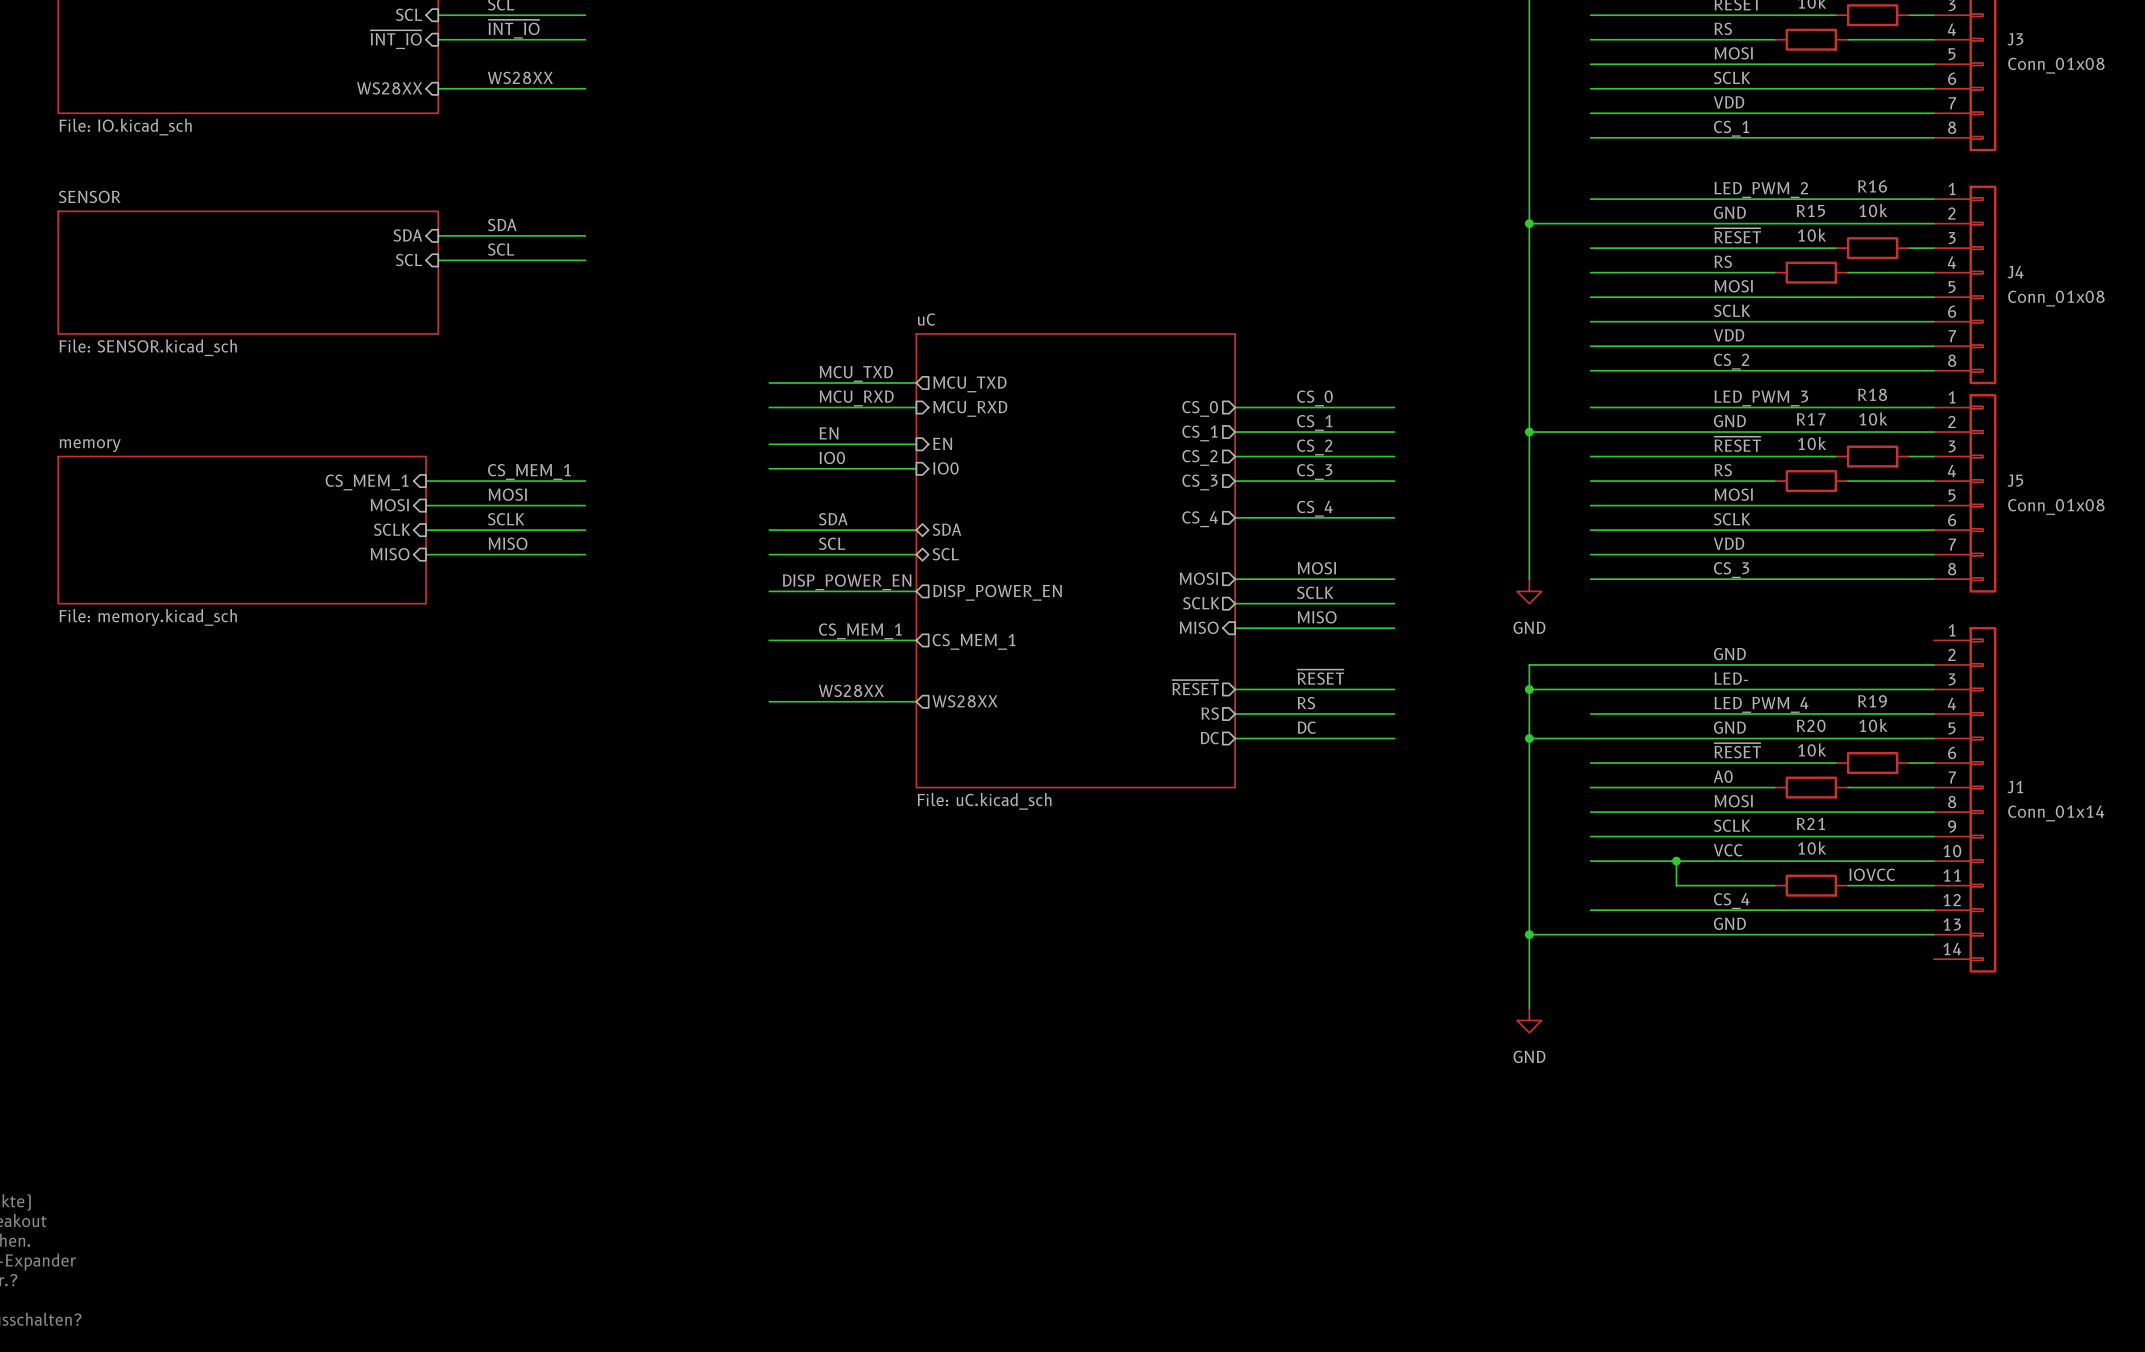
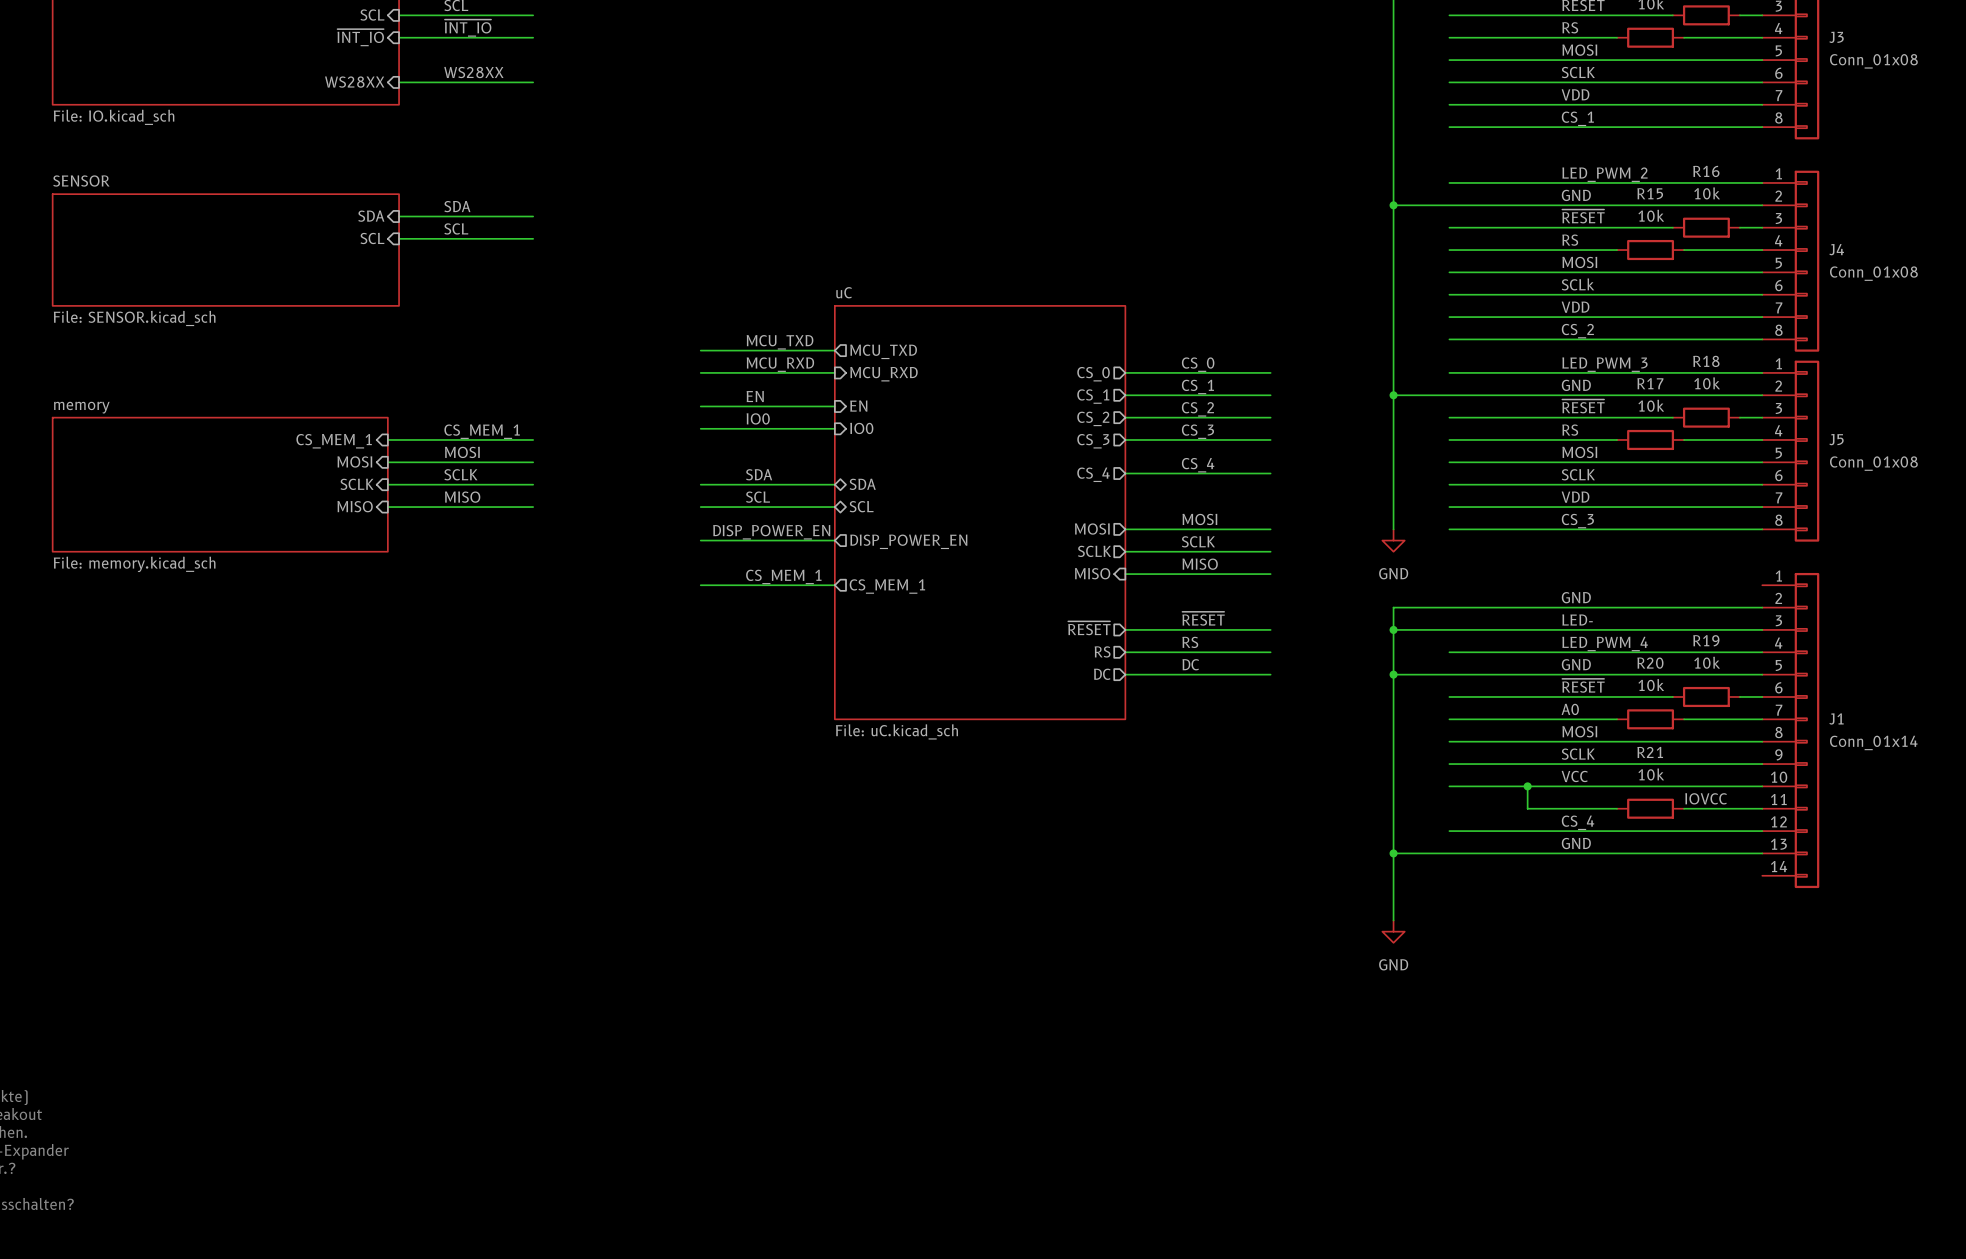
label: SCLK (1732, 310) -> SCLk (1578, 284)
label: WS28XX (851, 690) -> none
wire: (769, 701) (916, 701) -> none
sheet pin: WS28XX (965, 701) -> none

